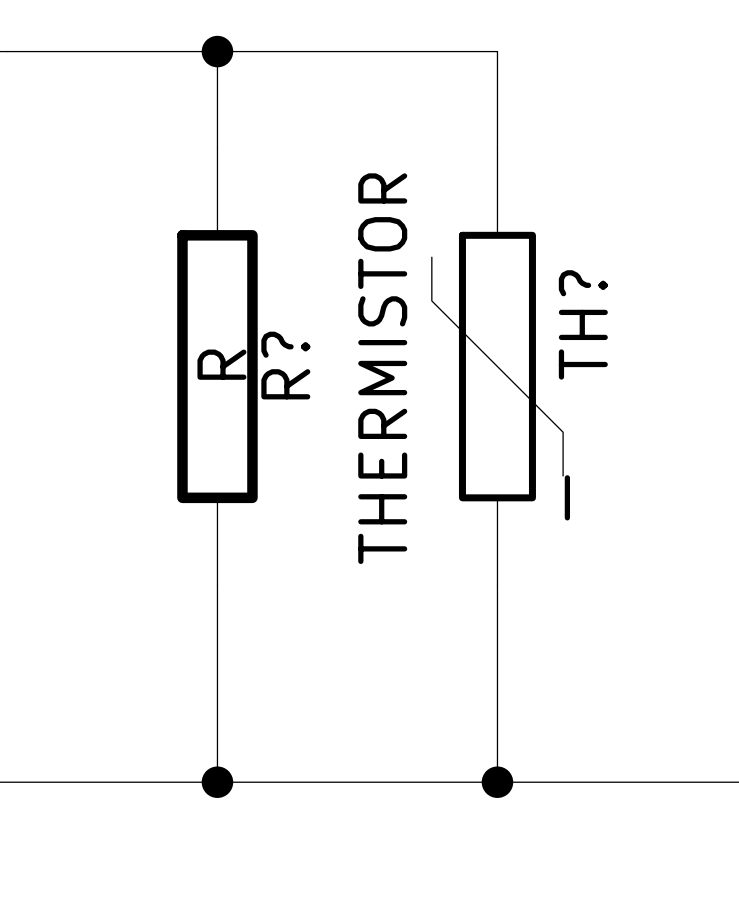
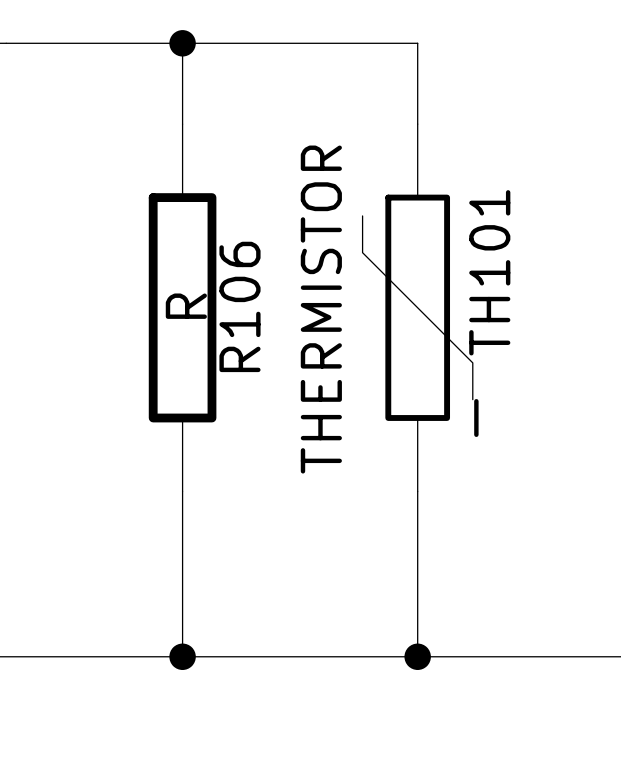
TH? name: TH? (583, 324) -> TH101 (489, 272)
R? name: R? (285, 365) -> R106 (239, 306)

